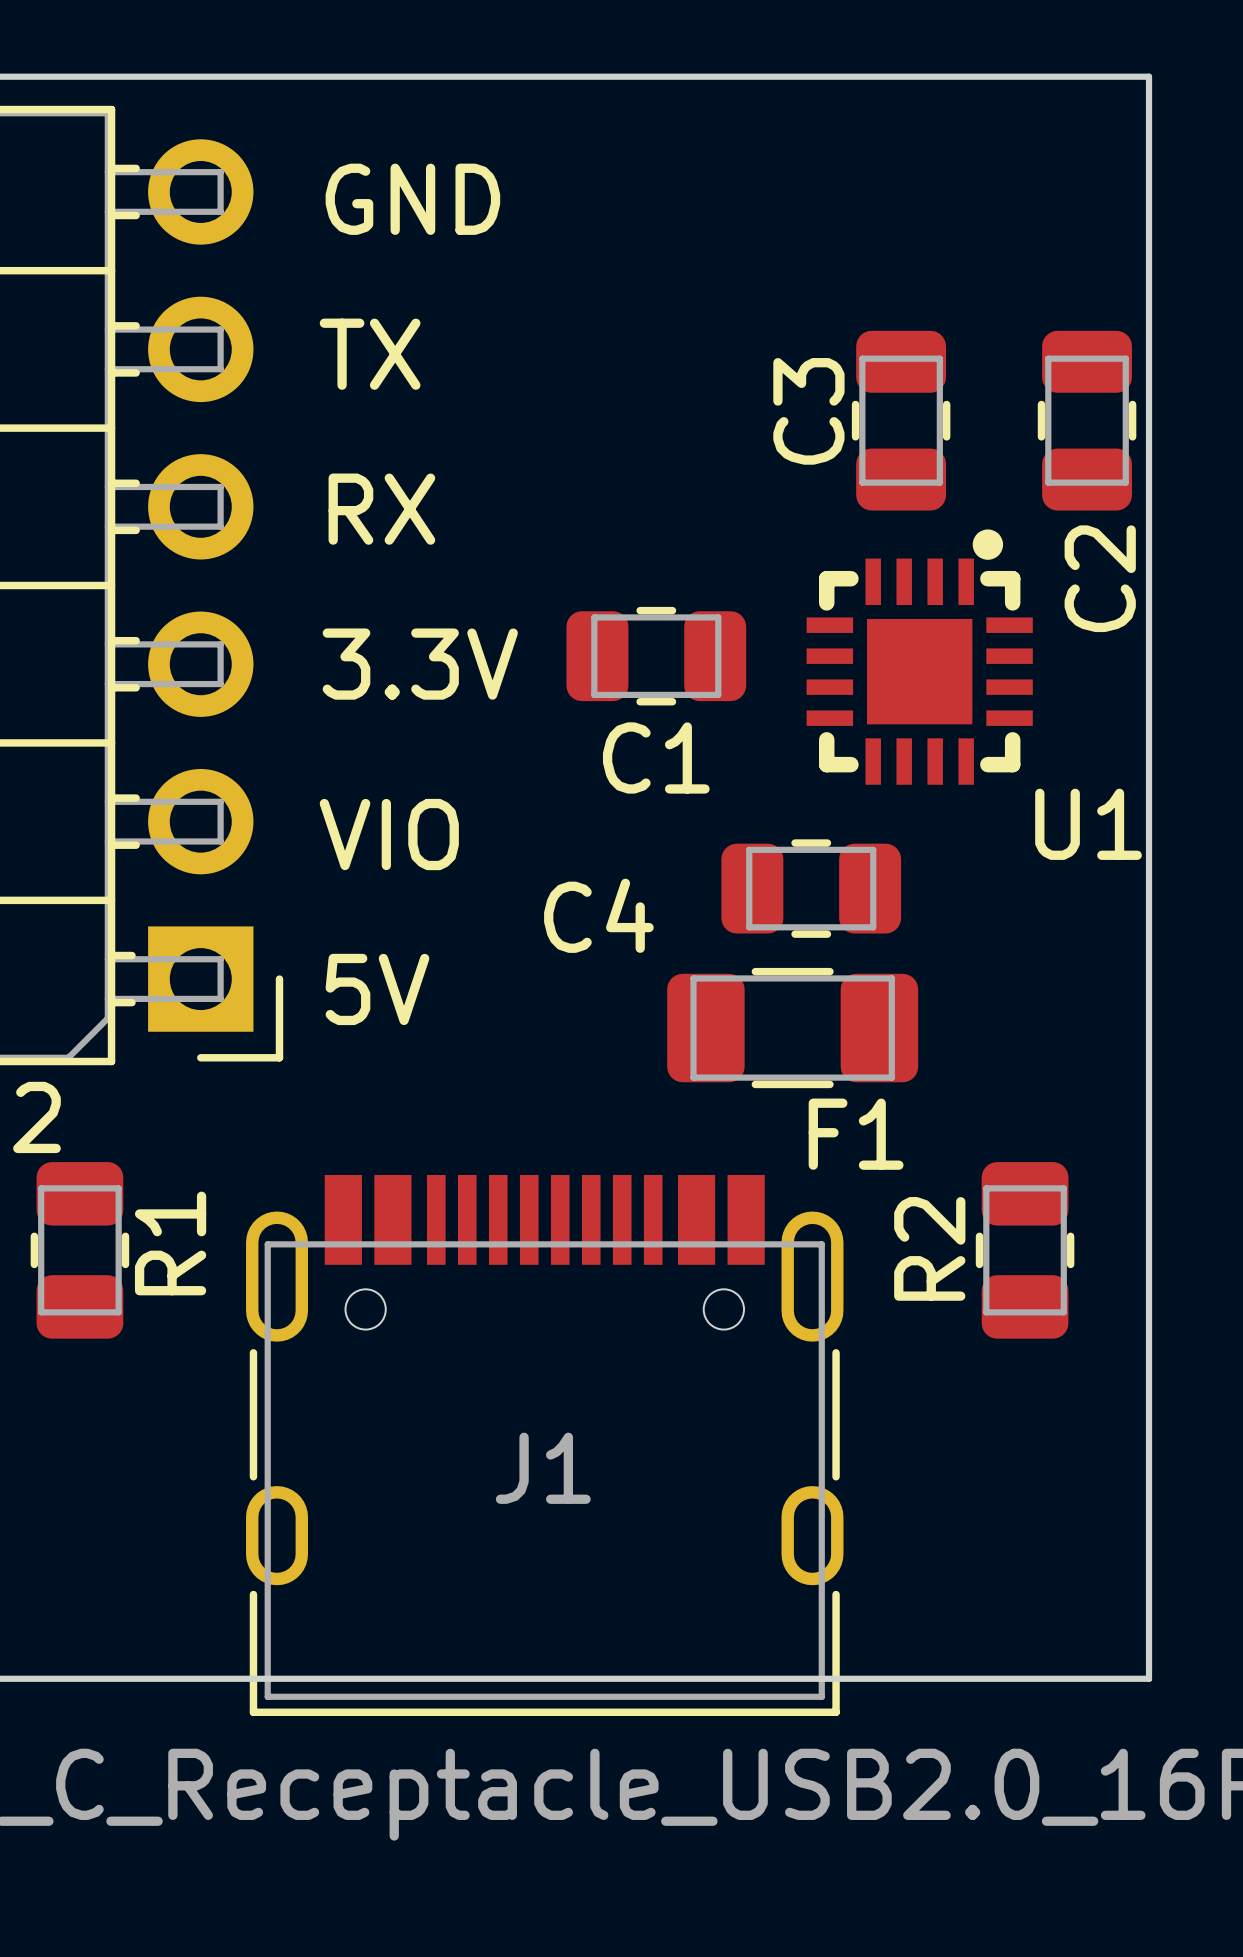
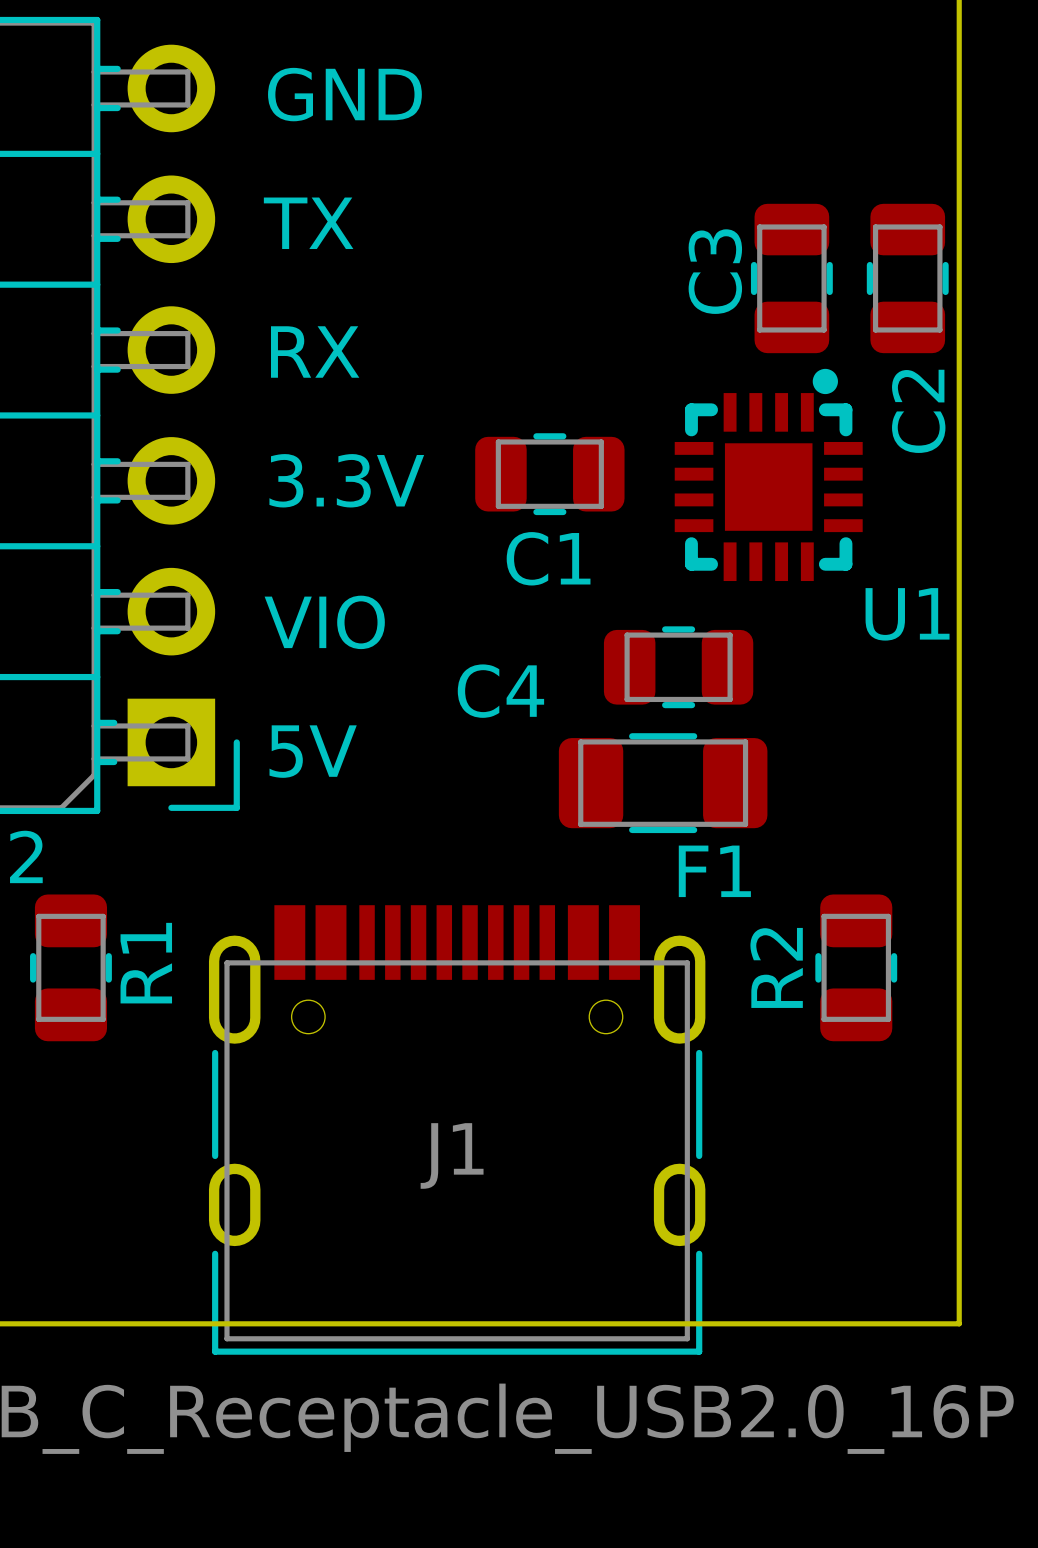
C3 position: (901, 420) -> (791, 278)

